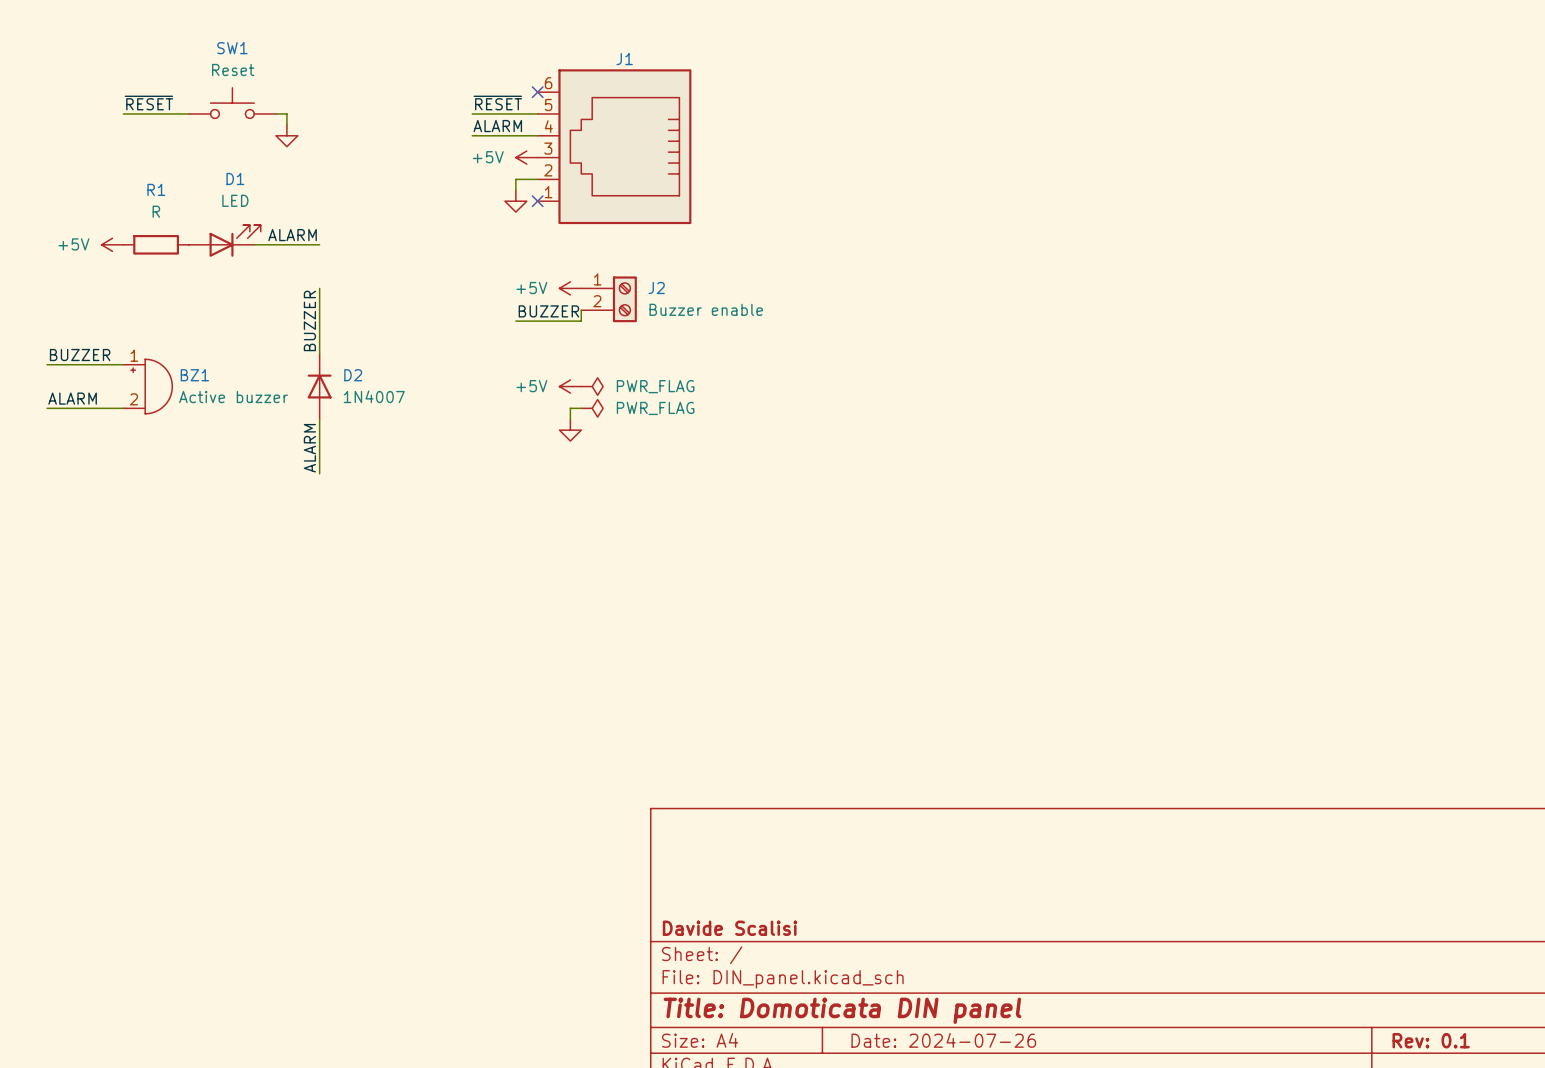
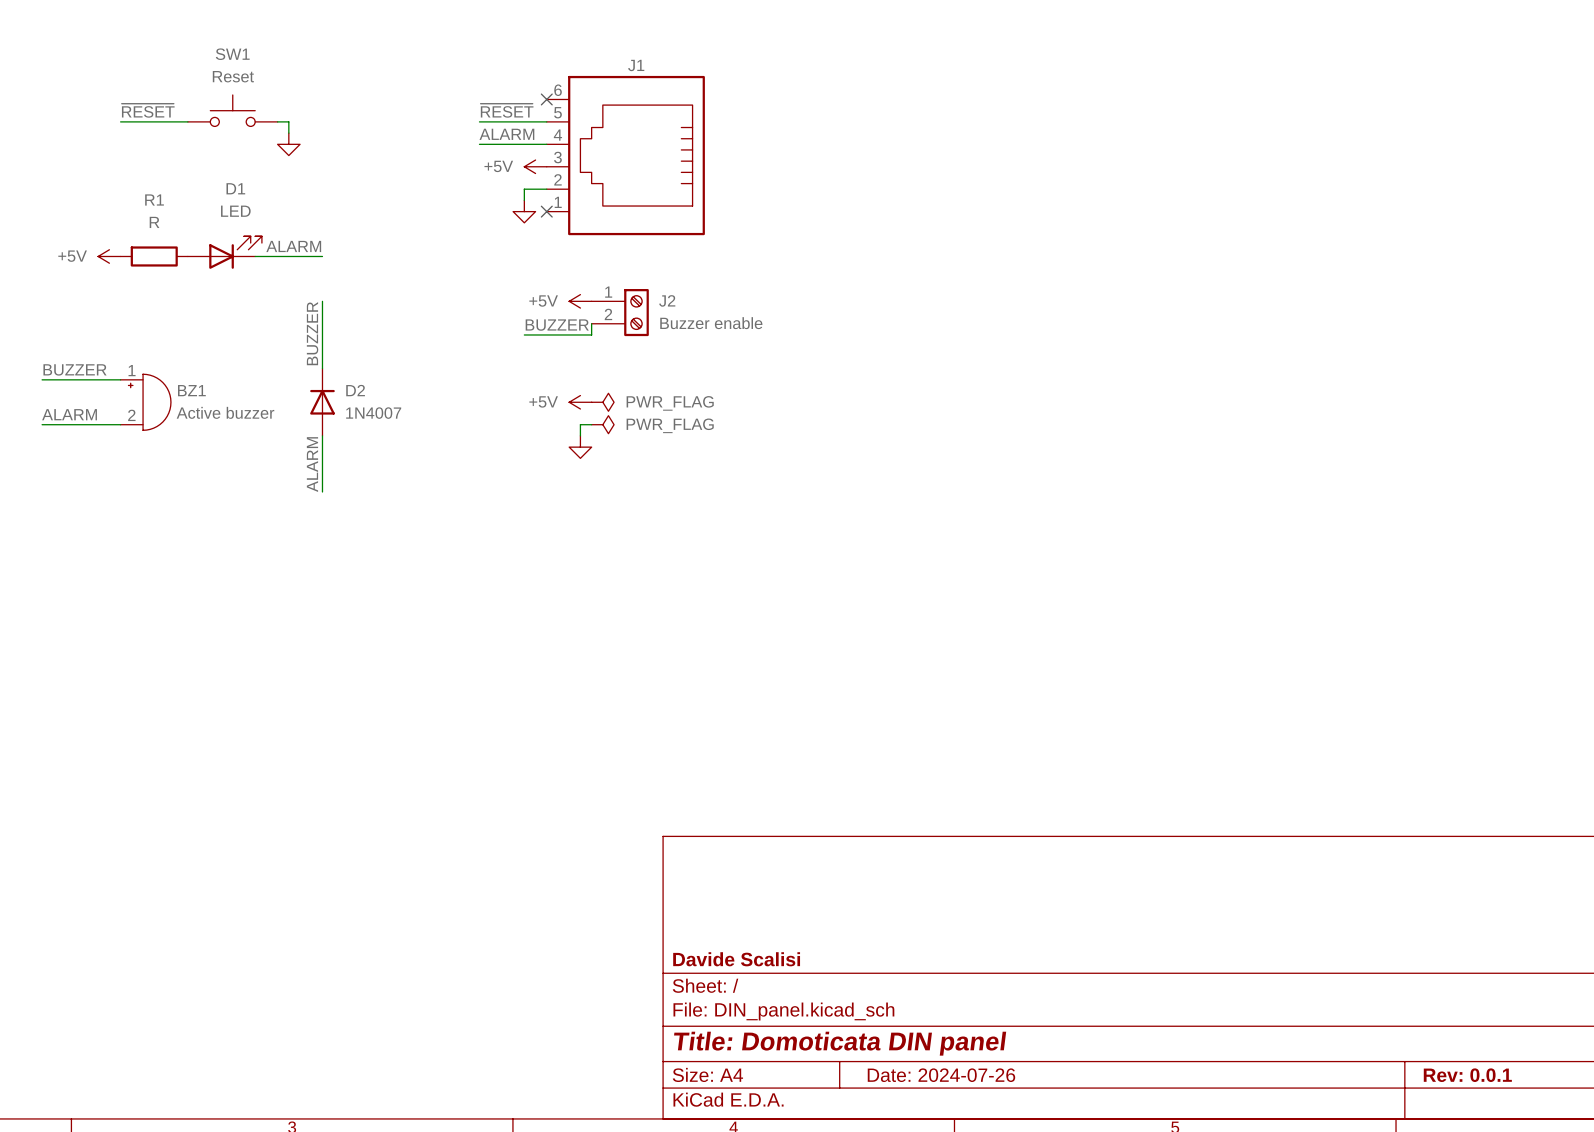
title block: Rev: 0.1 (1431, 1040) -> Rev: 0.0.1 (1467, 1075)

